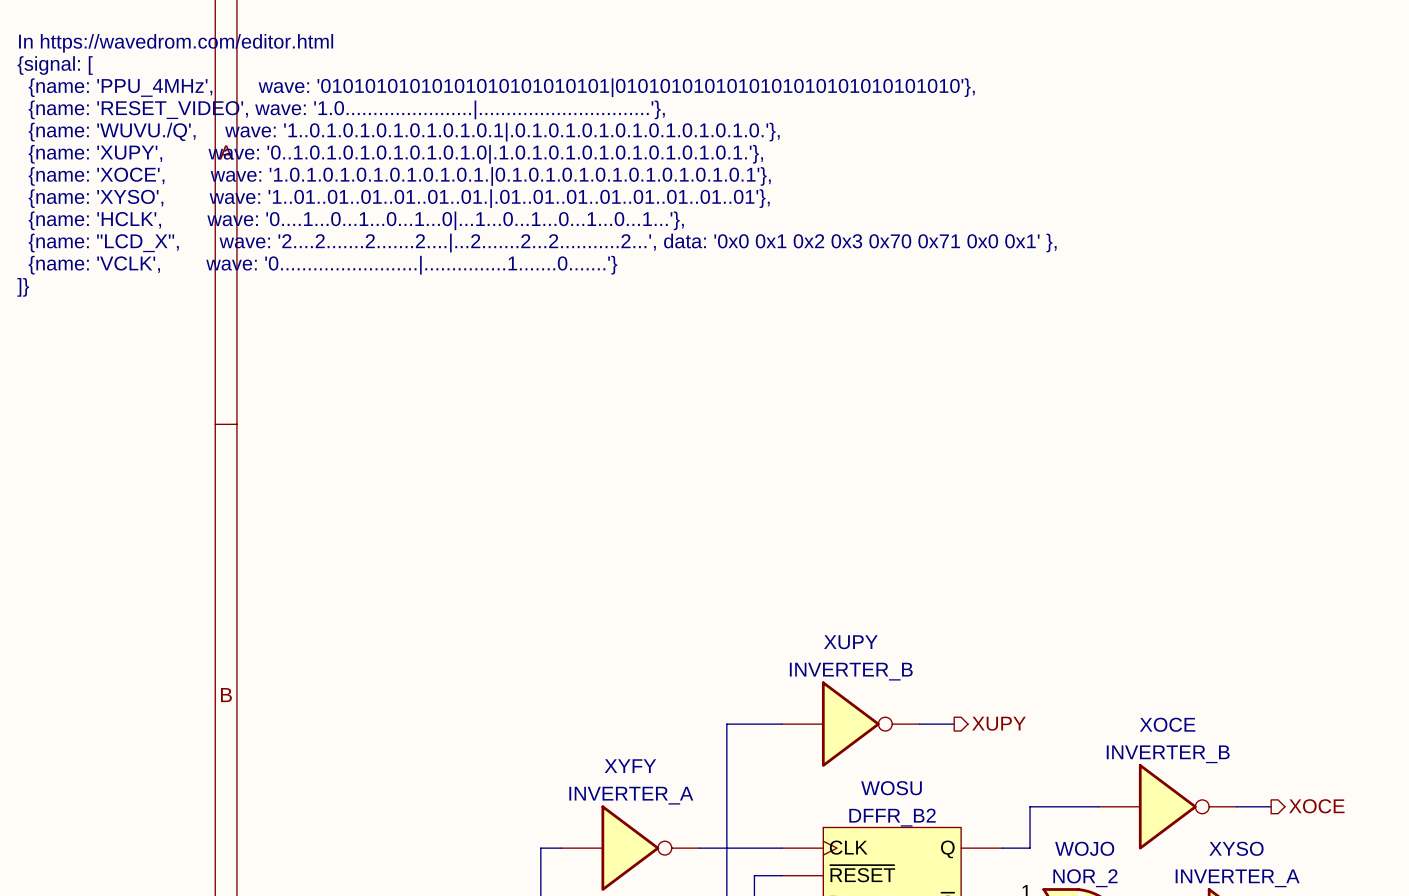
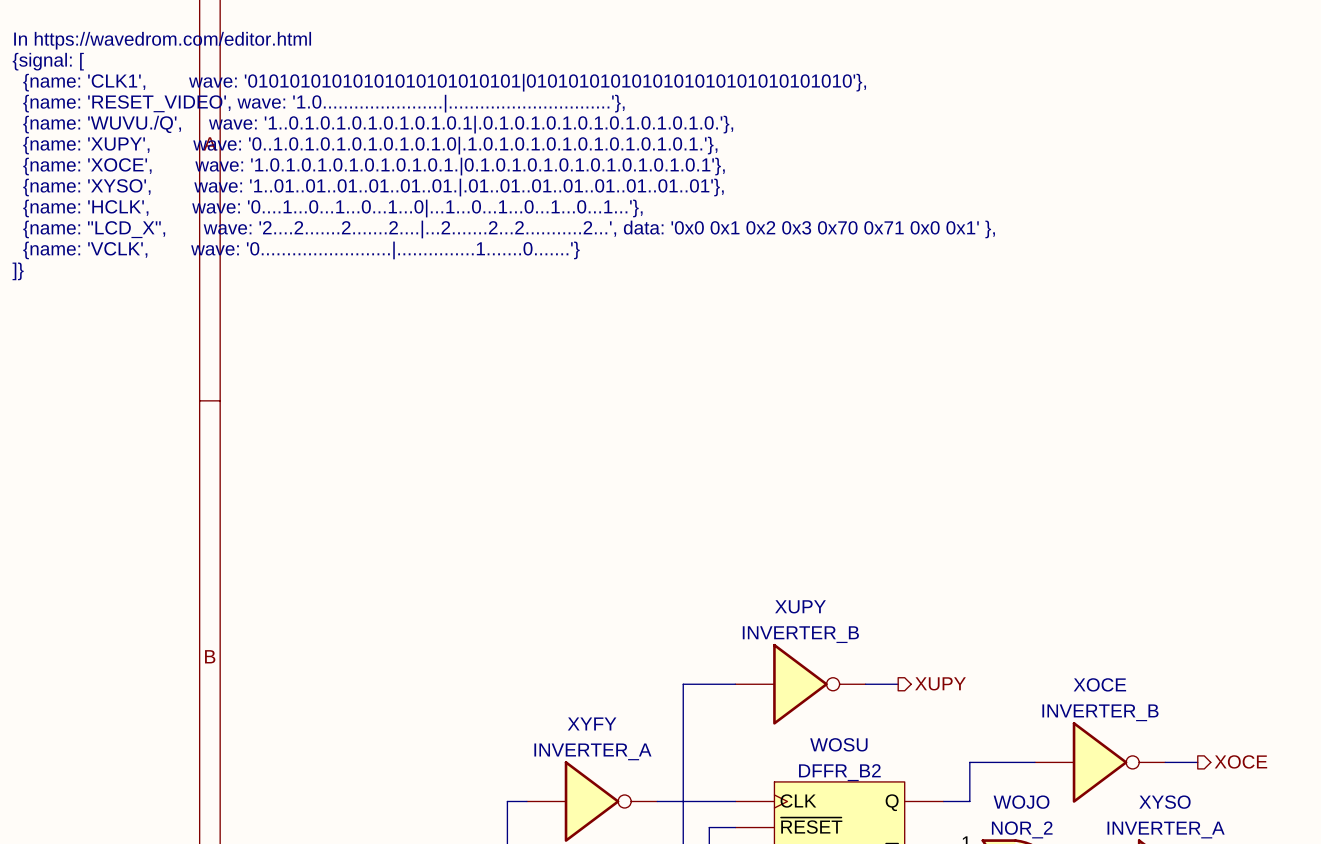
text: {name: 'PPU_4MHz', wave: '01010101010101010101010101|0101010101010101010101010101010'}, (501, 87) -> {name: 'CLK1', wave: '01010101010101010101010101|0101010101010101010101010101010'}, (444, 82)

